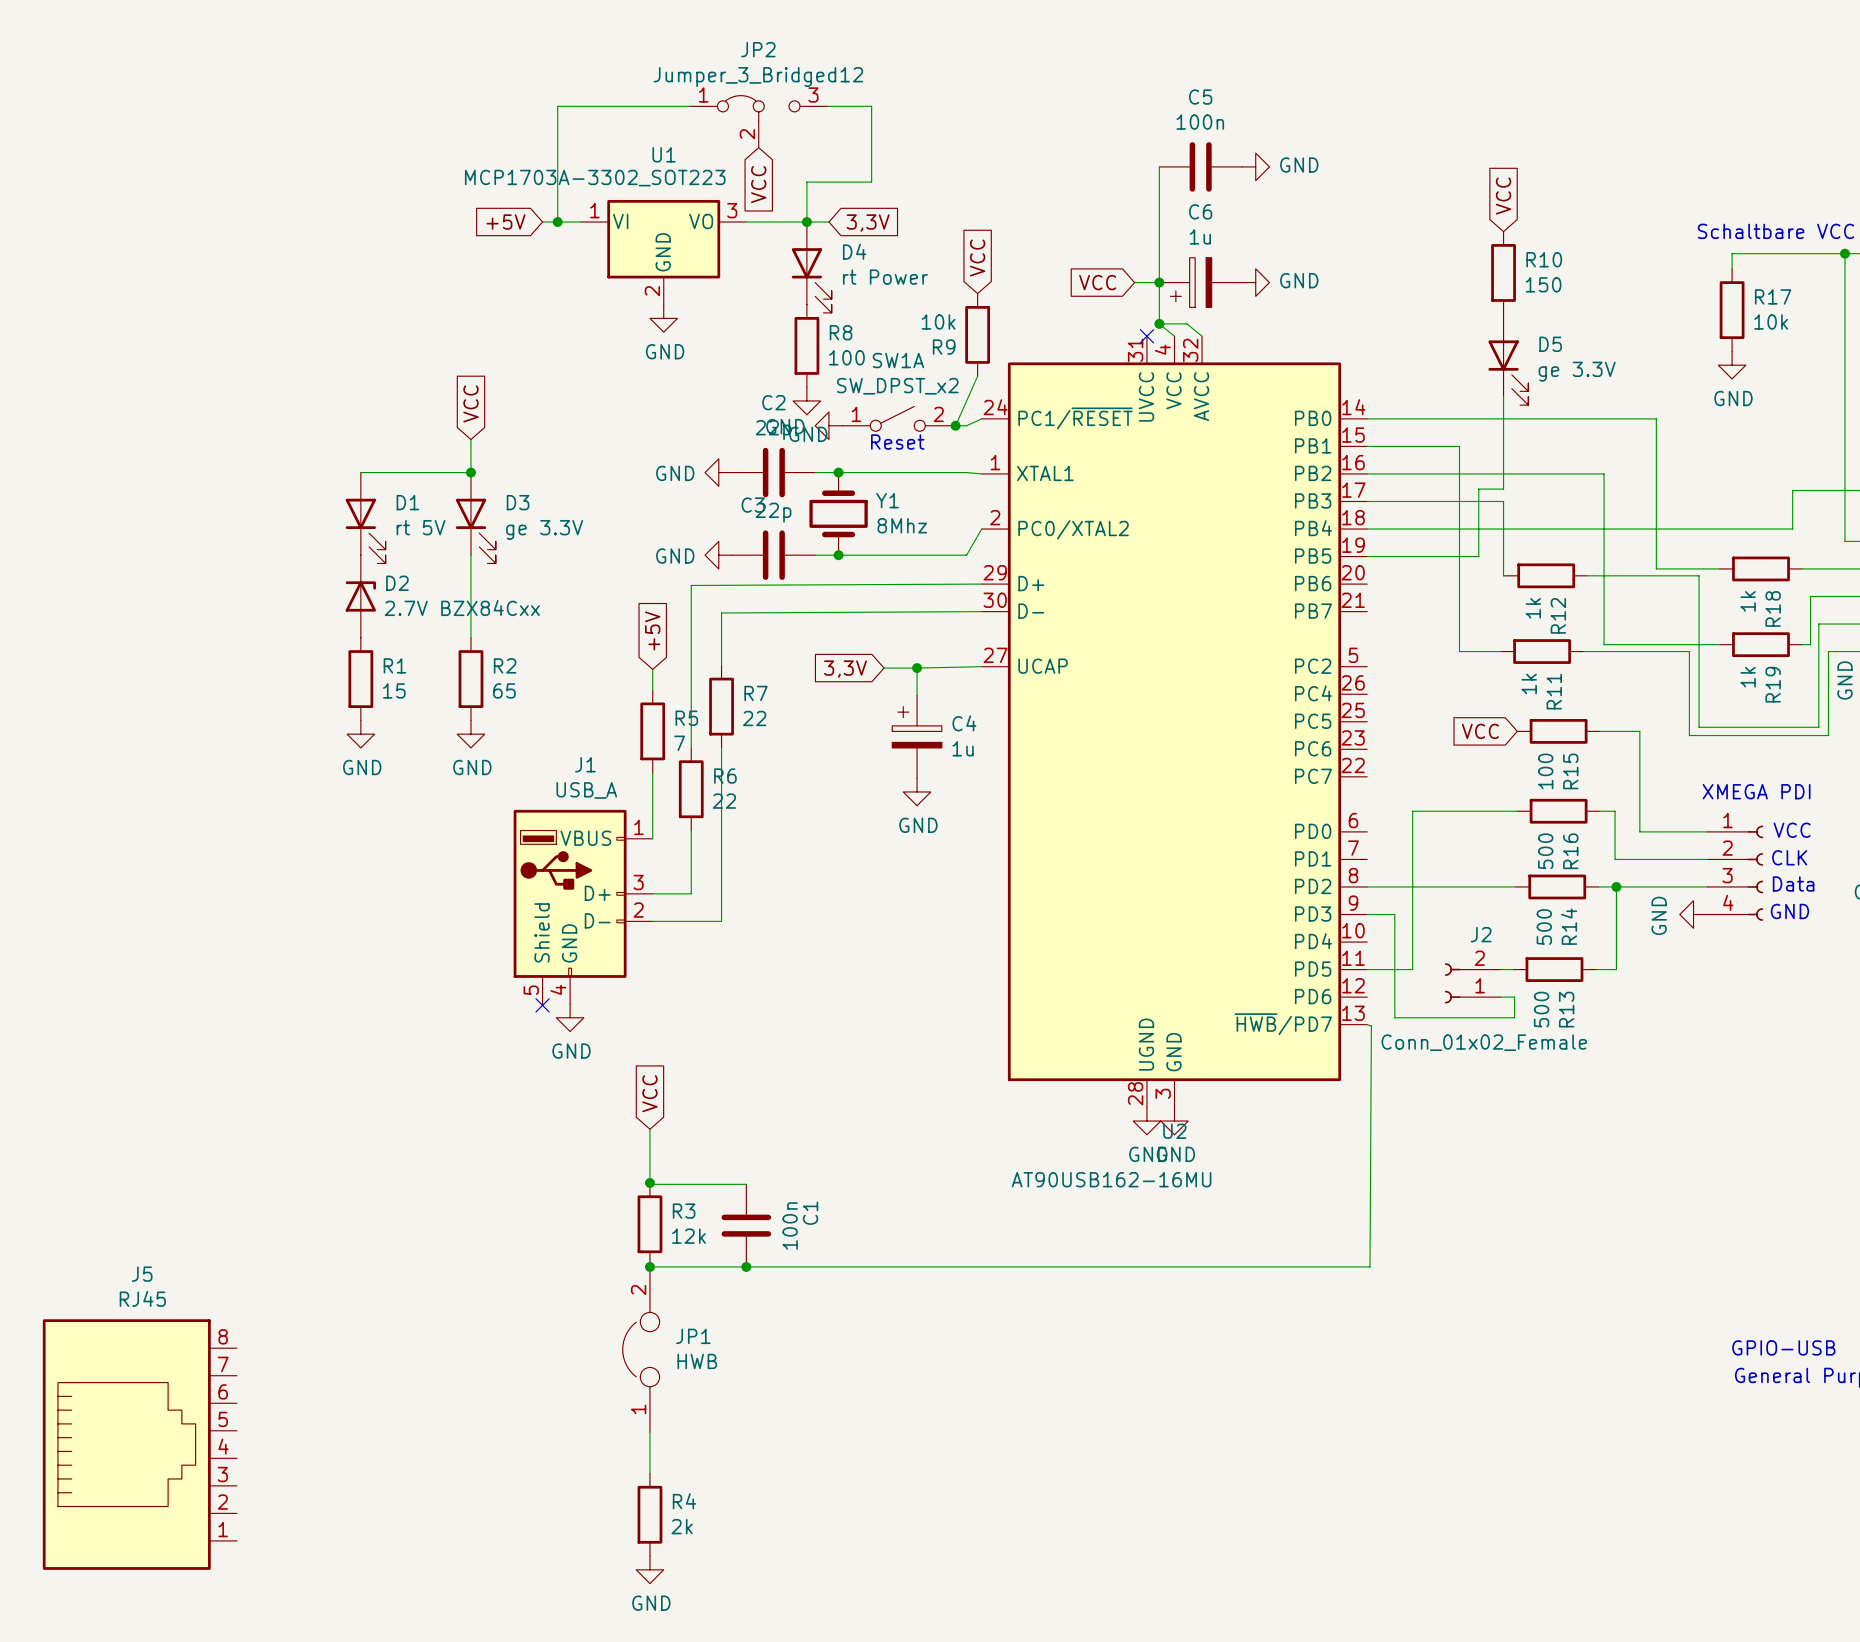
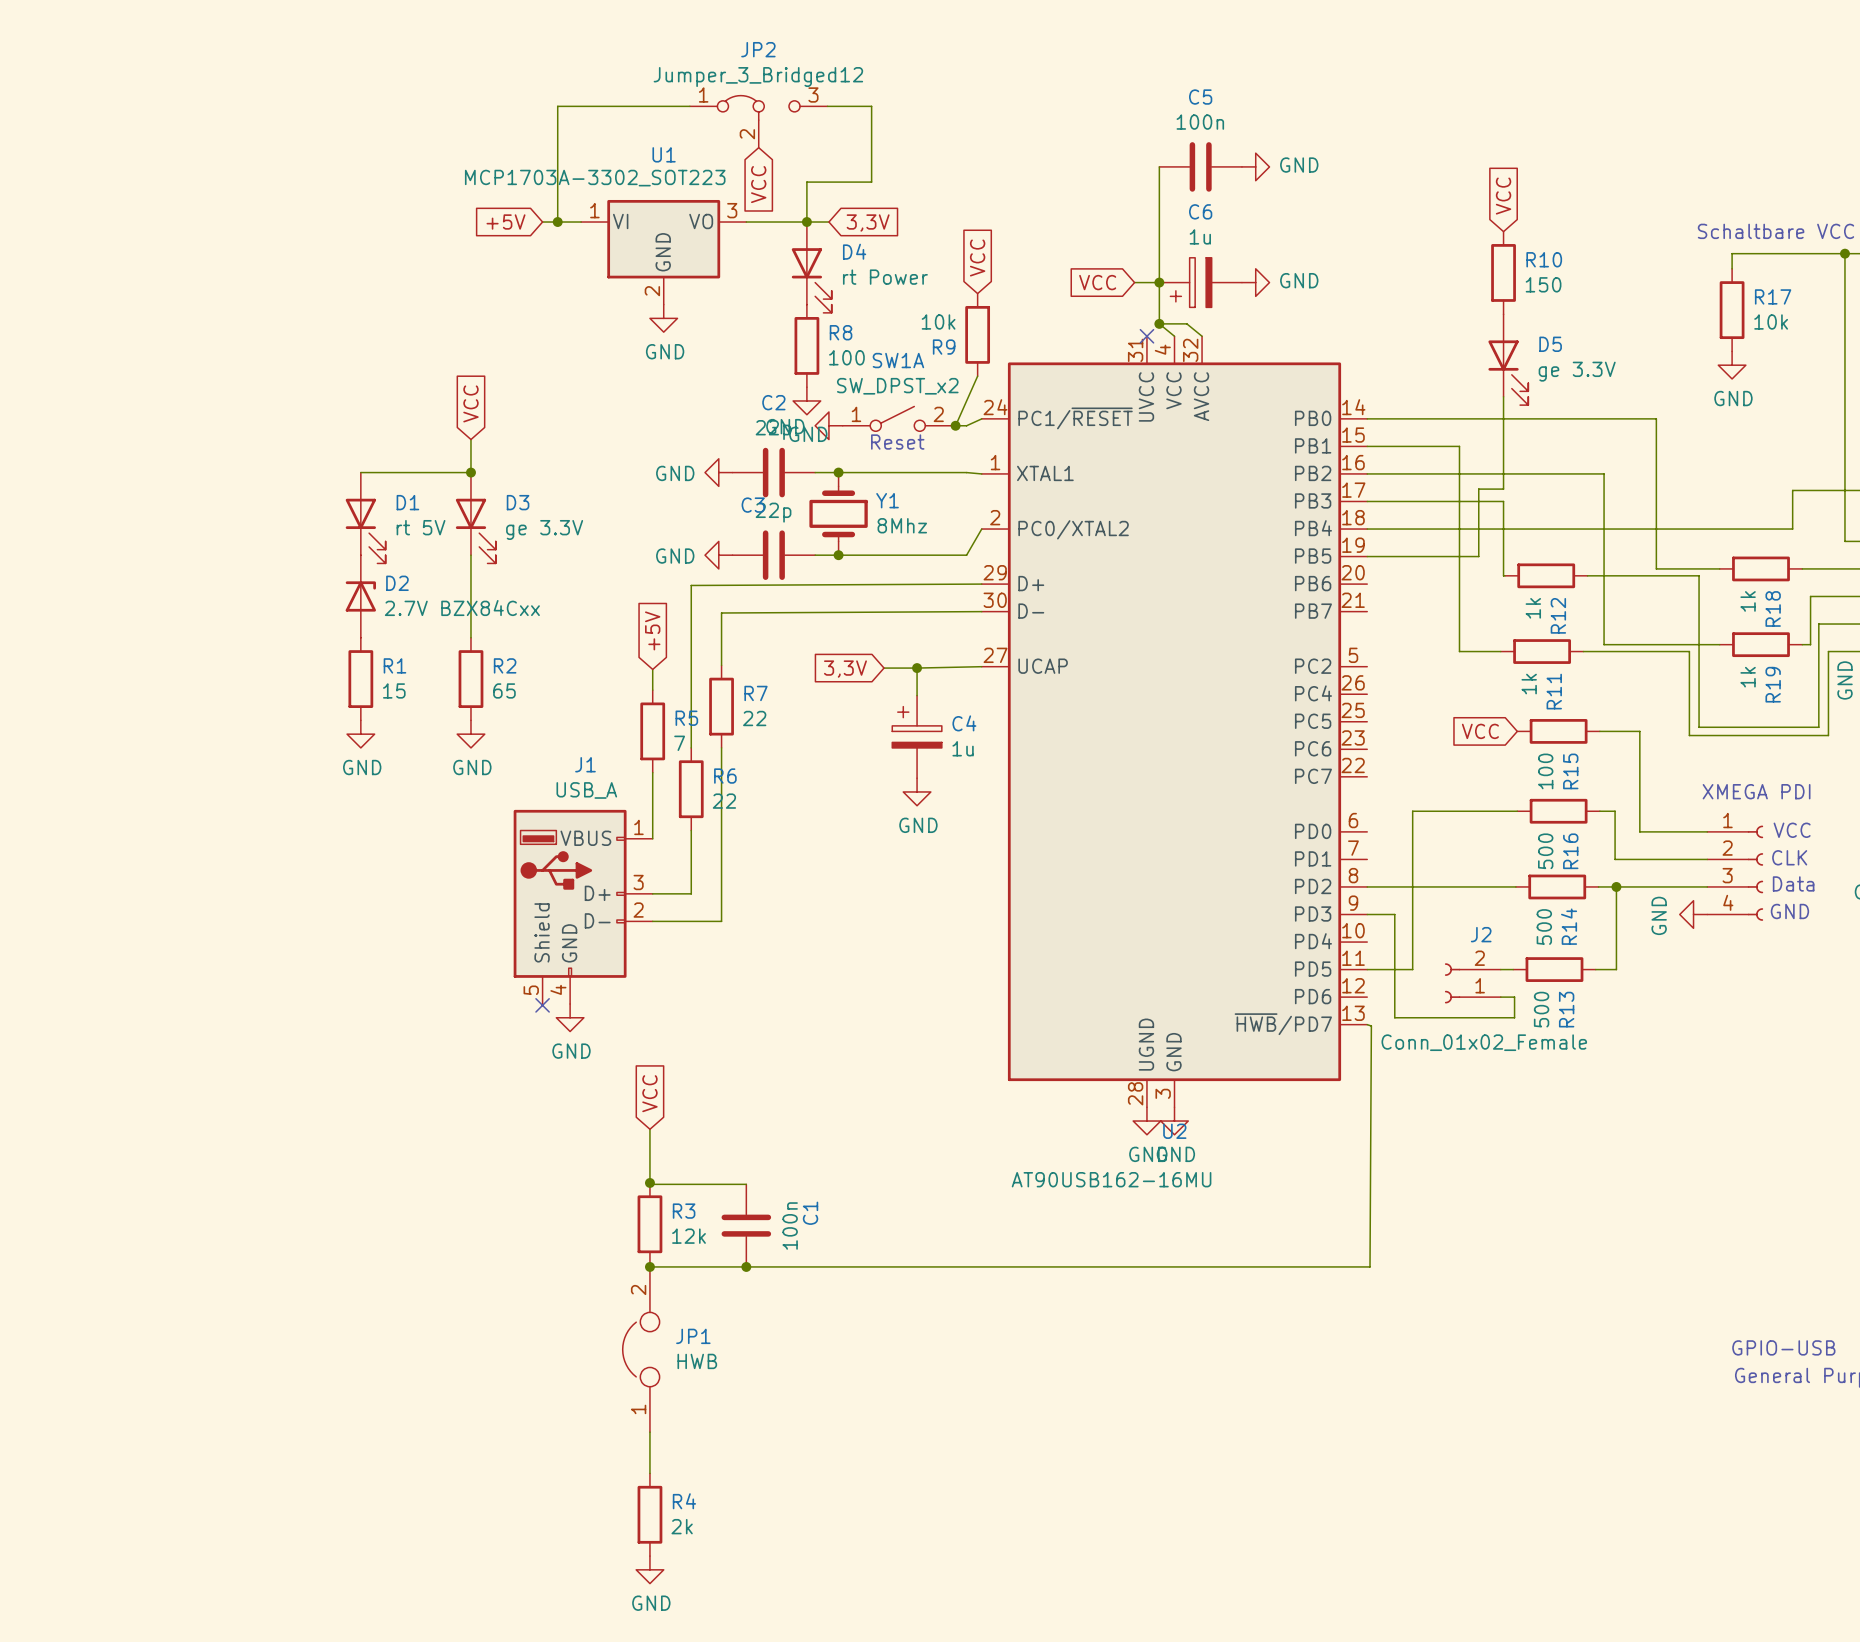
J5: RJ45 (139, 1444) -> none

